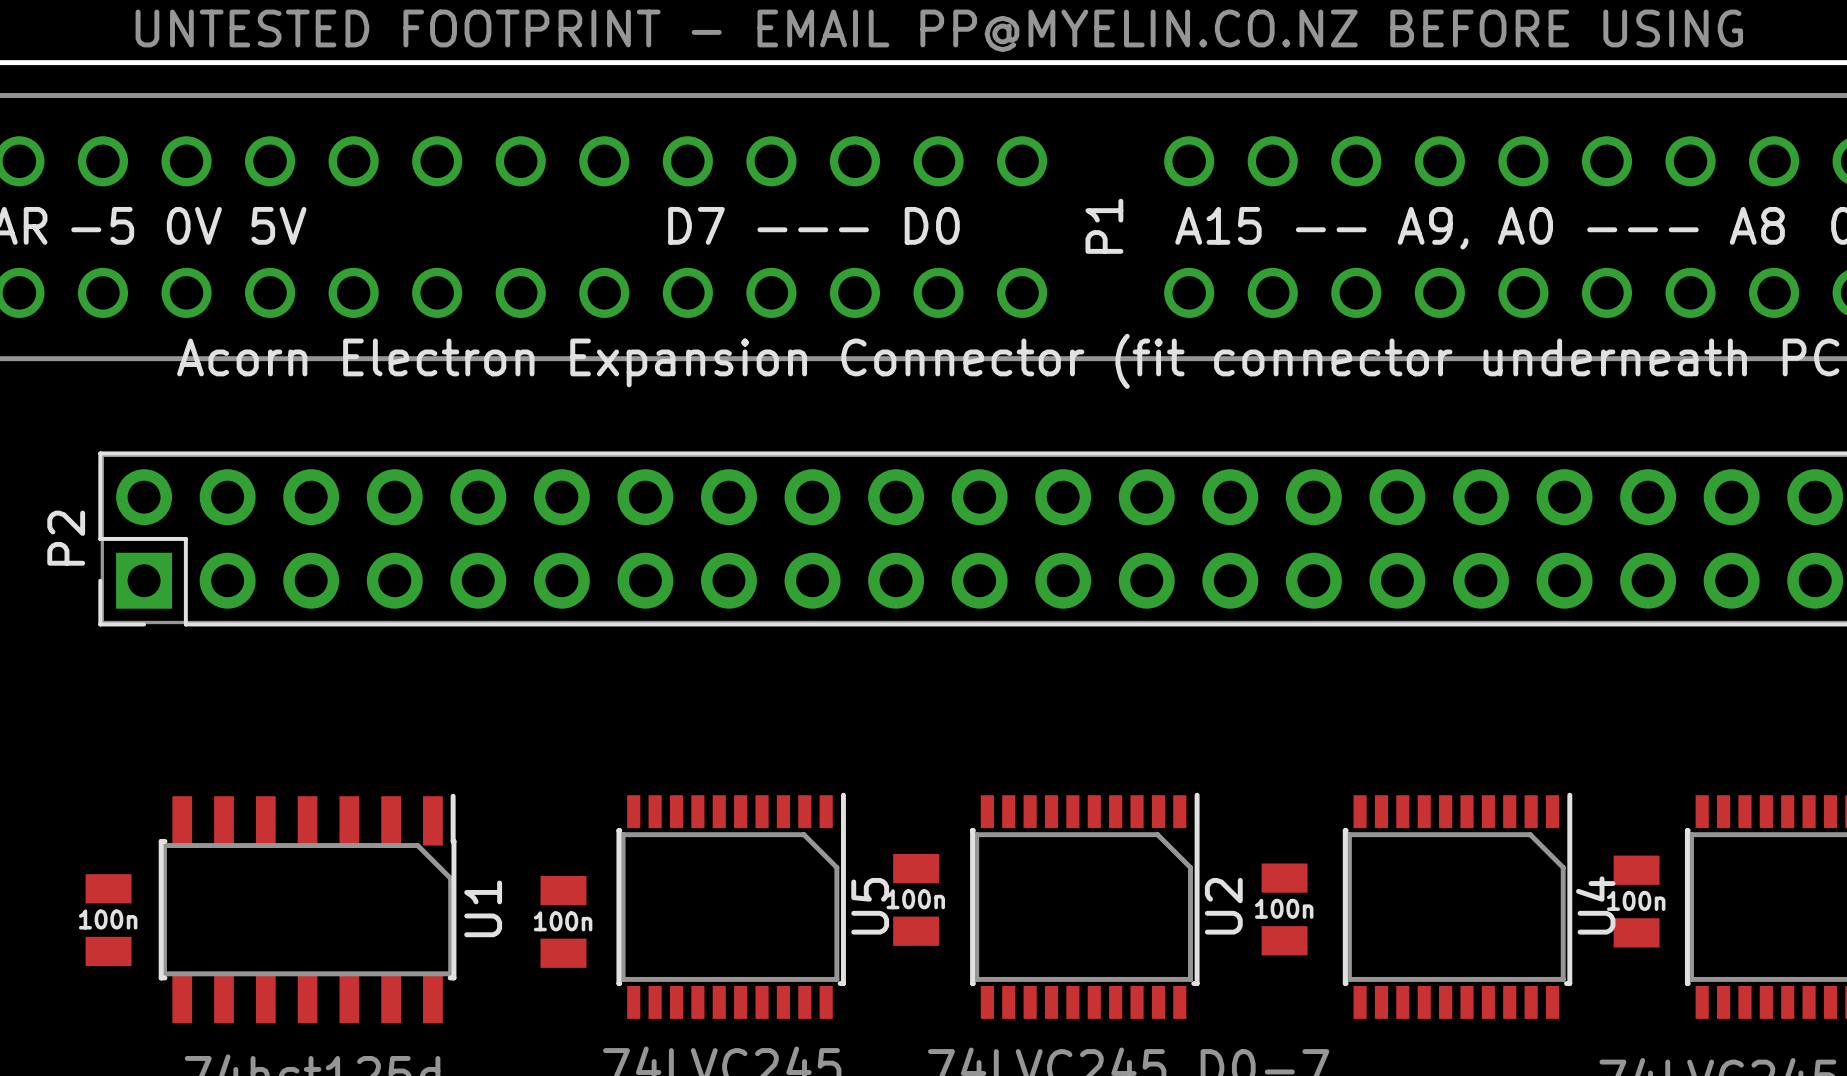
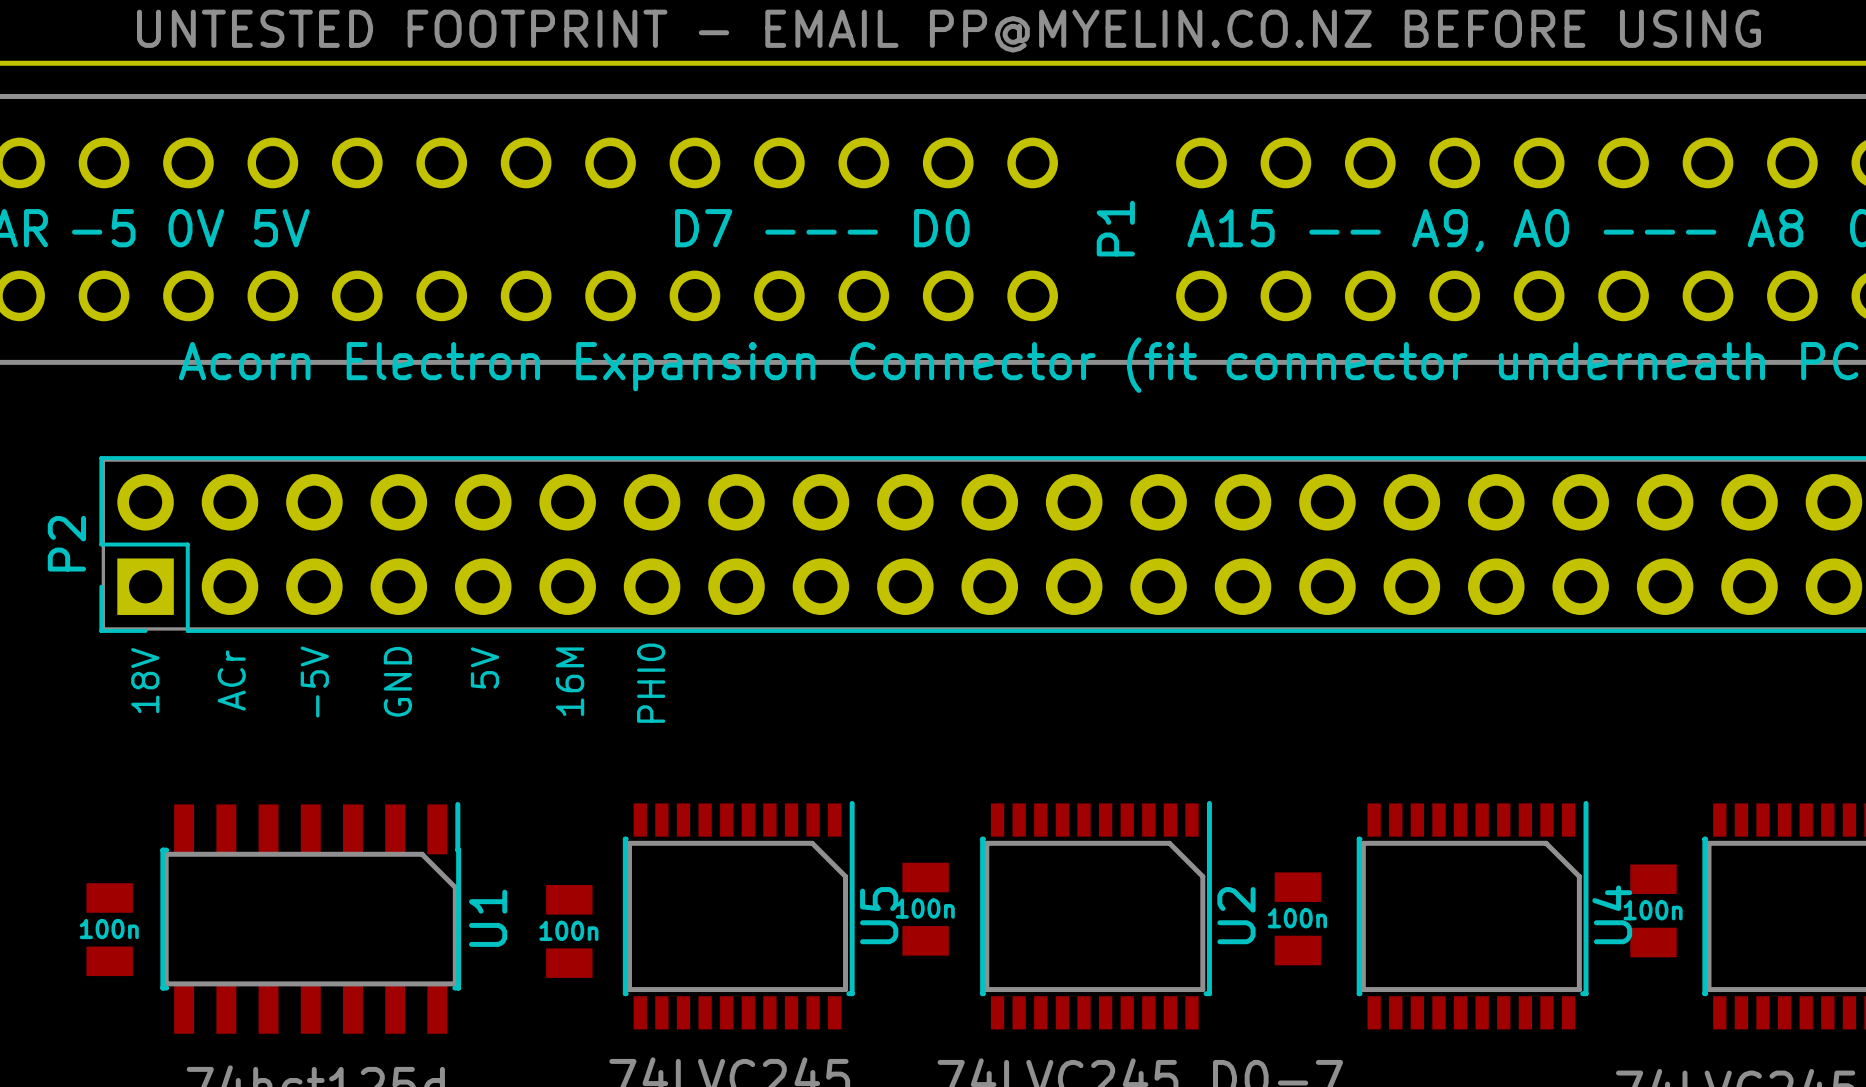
text: none -> 5V (484, 667)
text: none -> 18V (145, 680)
text: none -> ACr (231, 680)
text: none -> GND (397, 681)
text: none -> 16M (570, 681)
text: none -> -5V (314, 681)
text: none -> PHI0 (651, 683)

